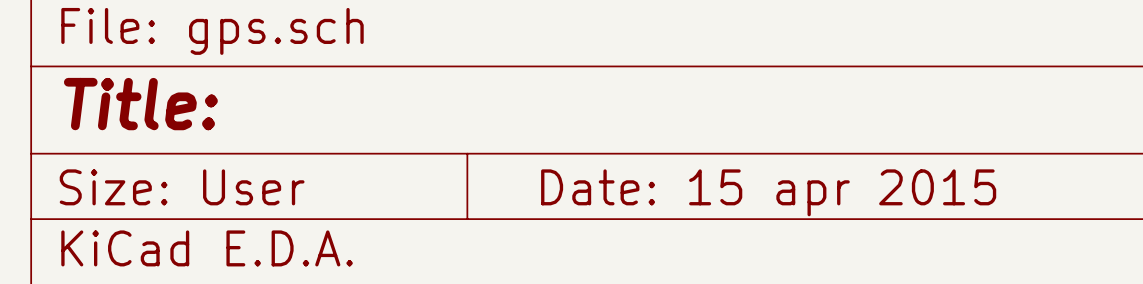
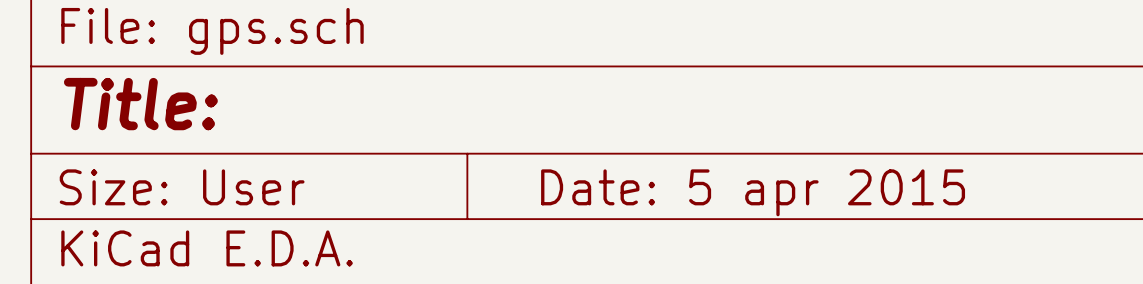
title block: Date: 15 apr 2015 (768, 192) -> Date: 5 apr 2015 (753, 192)

